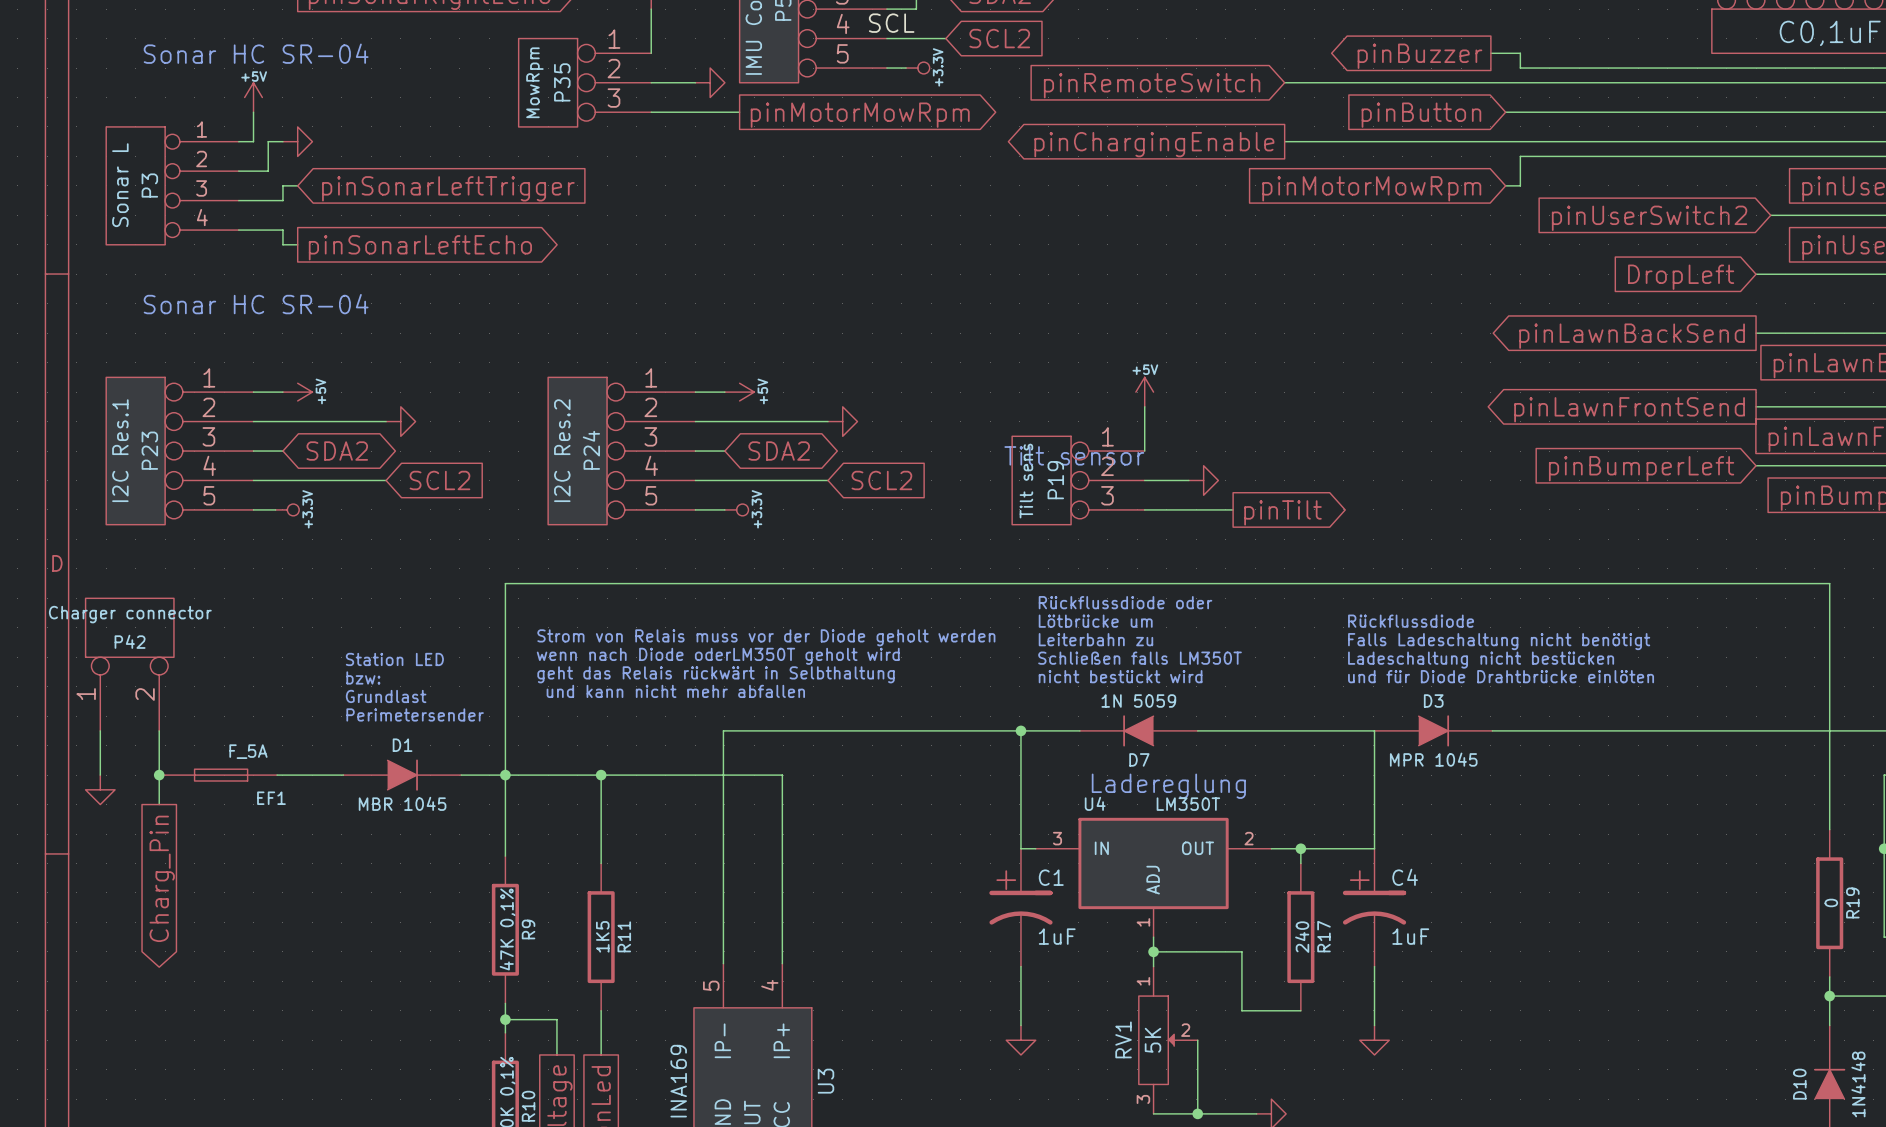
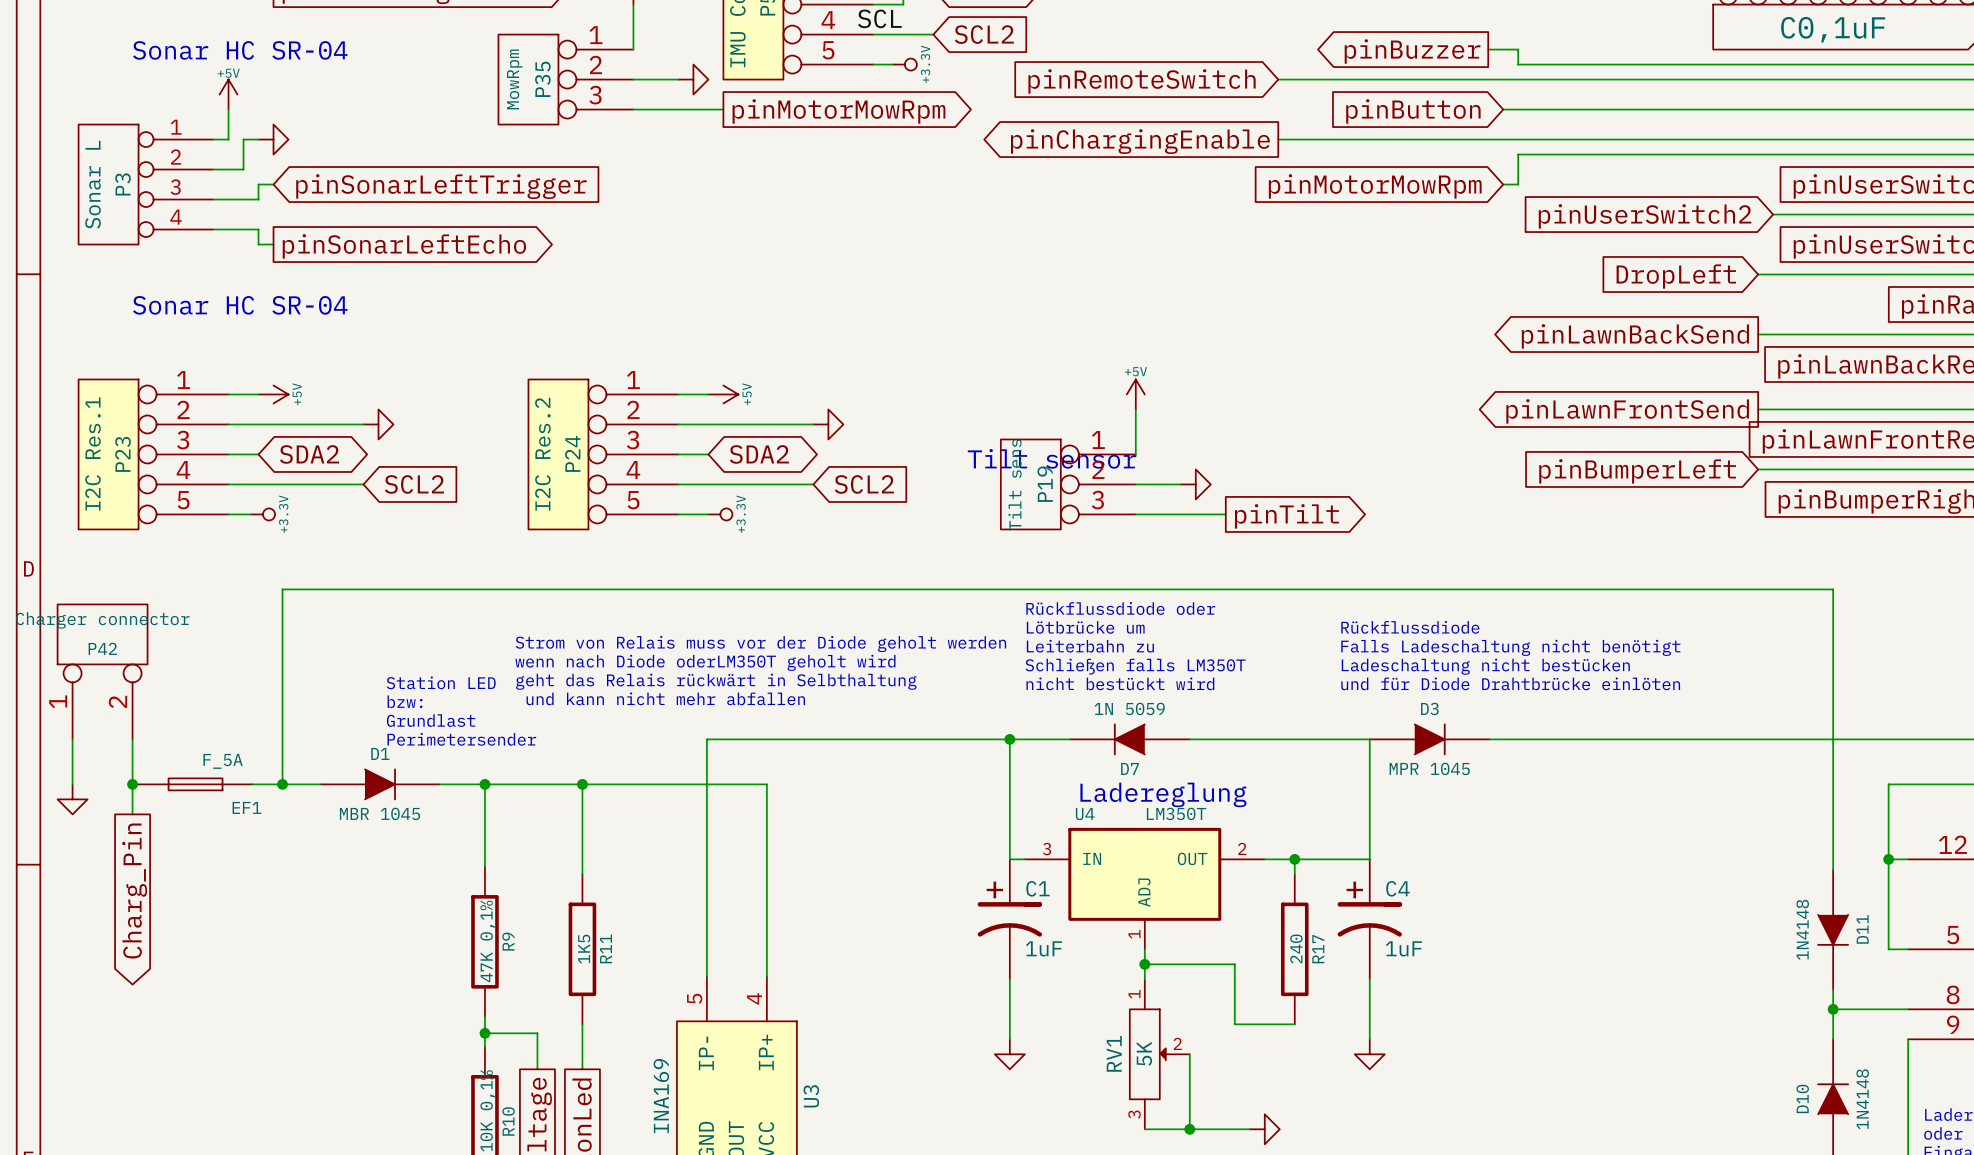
wire: (505, 583) (505, 775) -> (484, 589) (282, 589) (282, 784)
text position: Station LED (394, 659) -> Station LED (441, 682)
text position: bzw: (363, 677) -> bzw: (405, 701)
text position: Grundlast (386, 696) -> Grundlast (431, 720)
text position: Perimetersender (415, 714) -> Perimetersender (461, 739)
junction: none -> (282, 784)
R19: 0 (1829, 903) -> none
D11: none -> 1N4148 (1833, 929)

